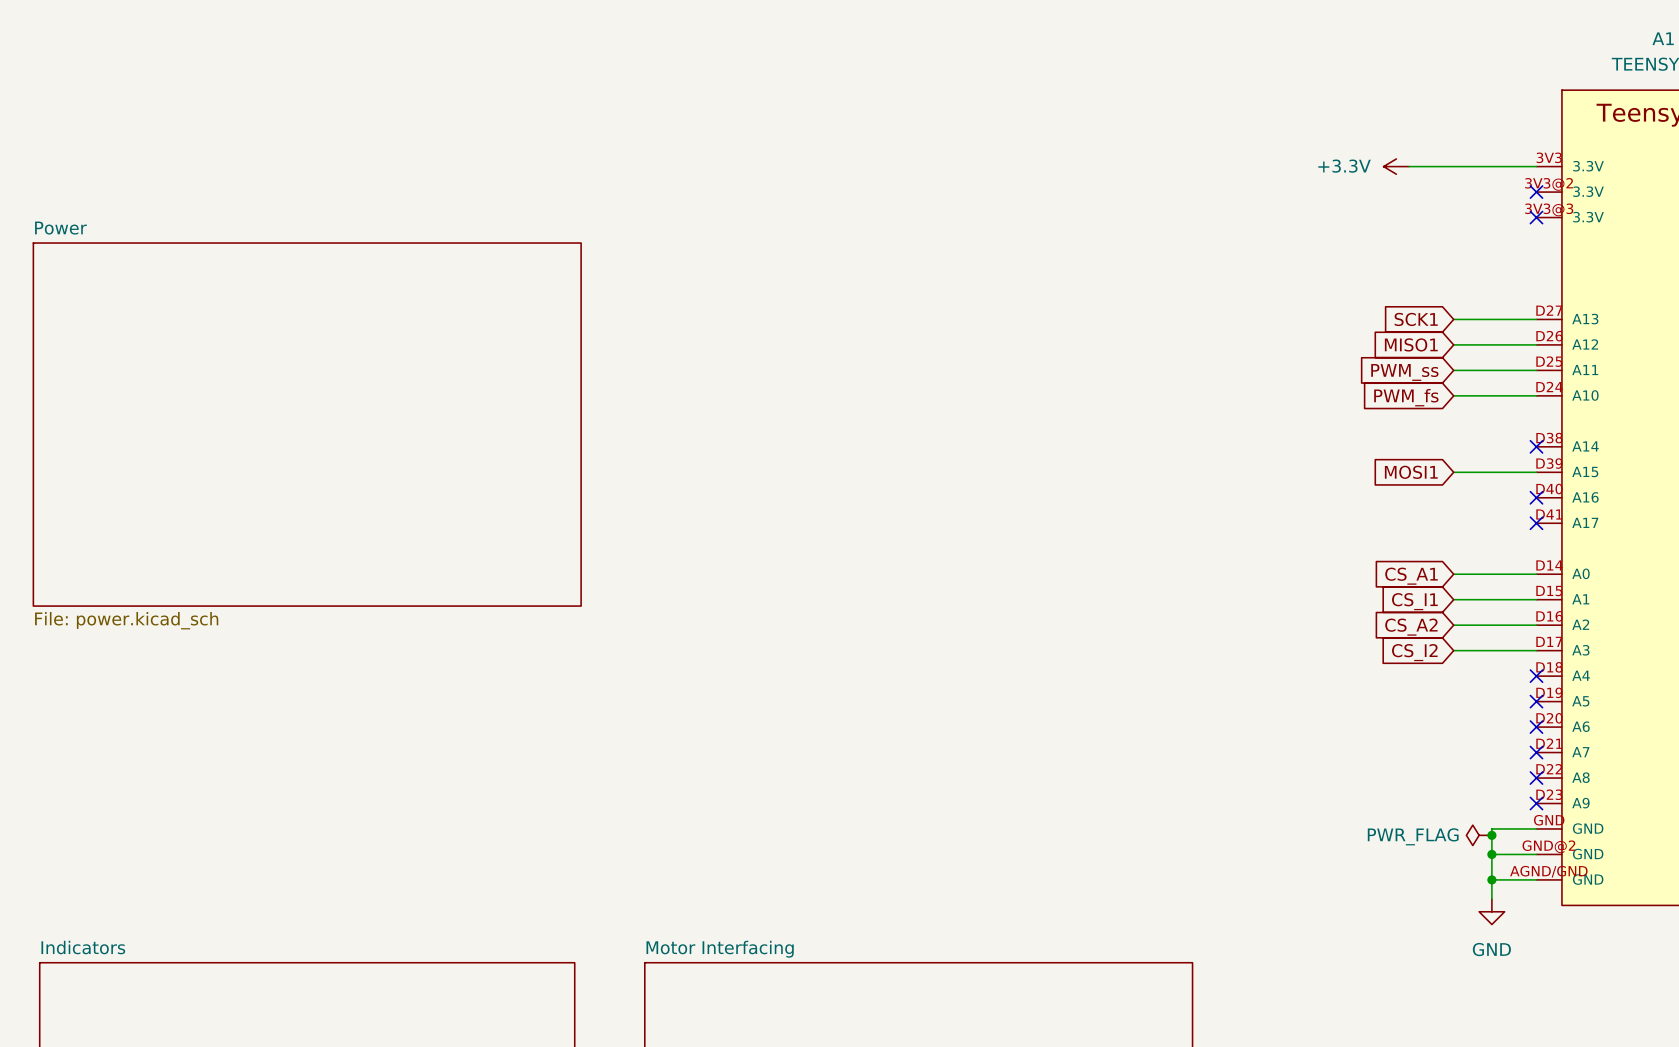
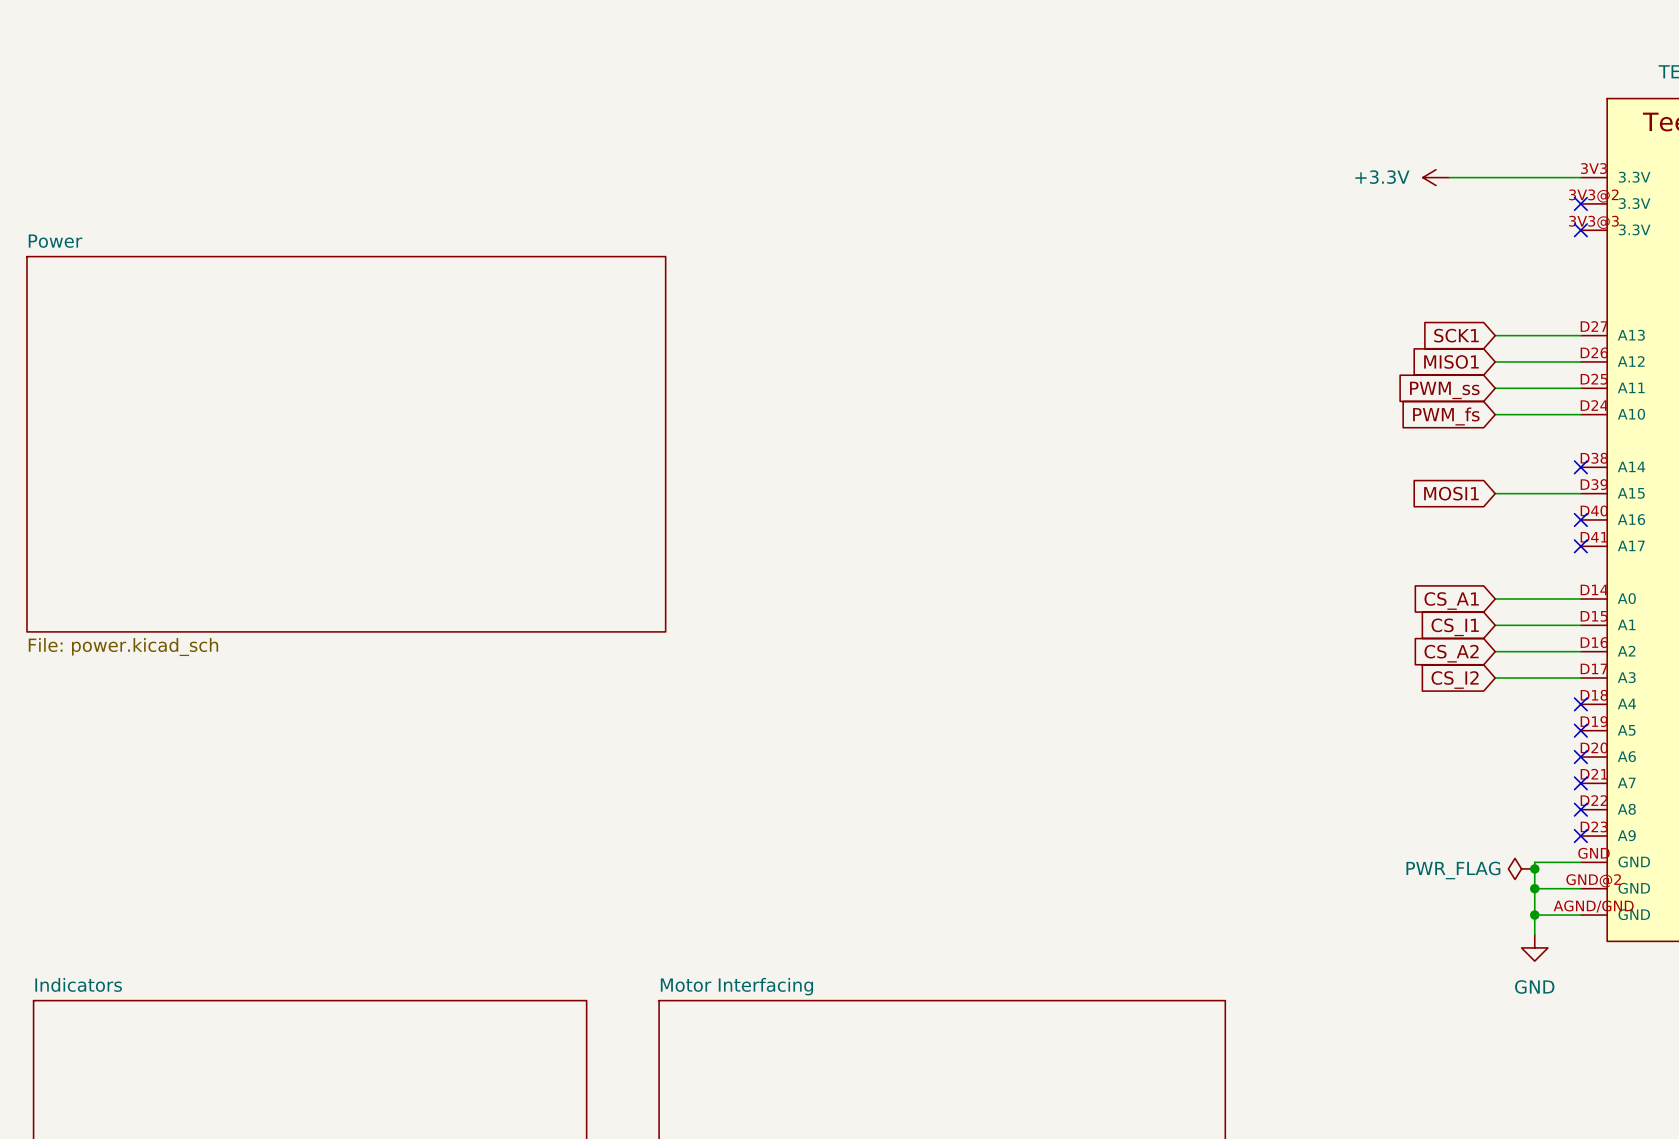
sheet Power: File: power.kicad_sch (307, 424) -> none
sheet Power: none -> File: power.kicad_sch (346, 444)

